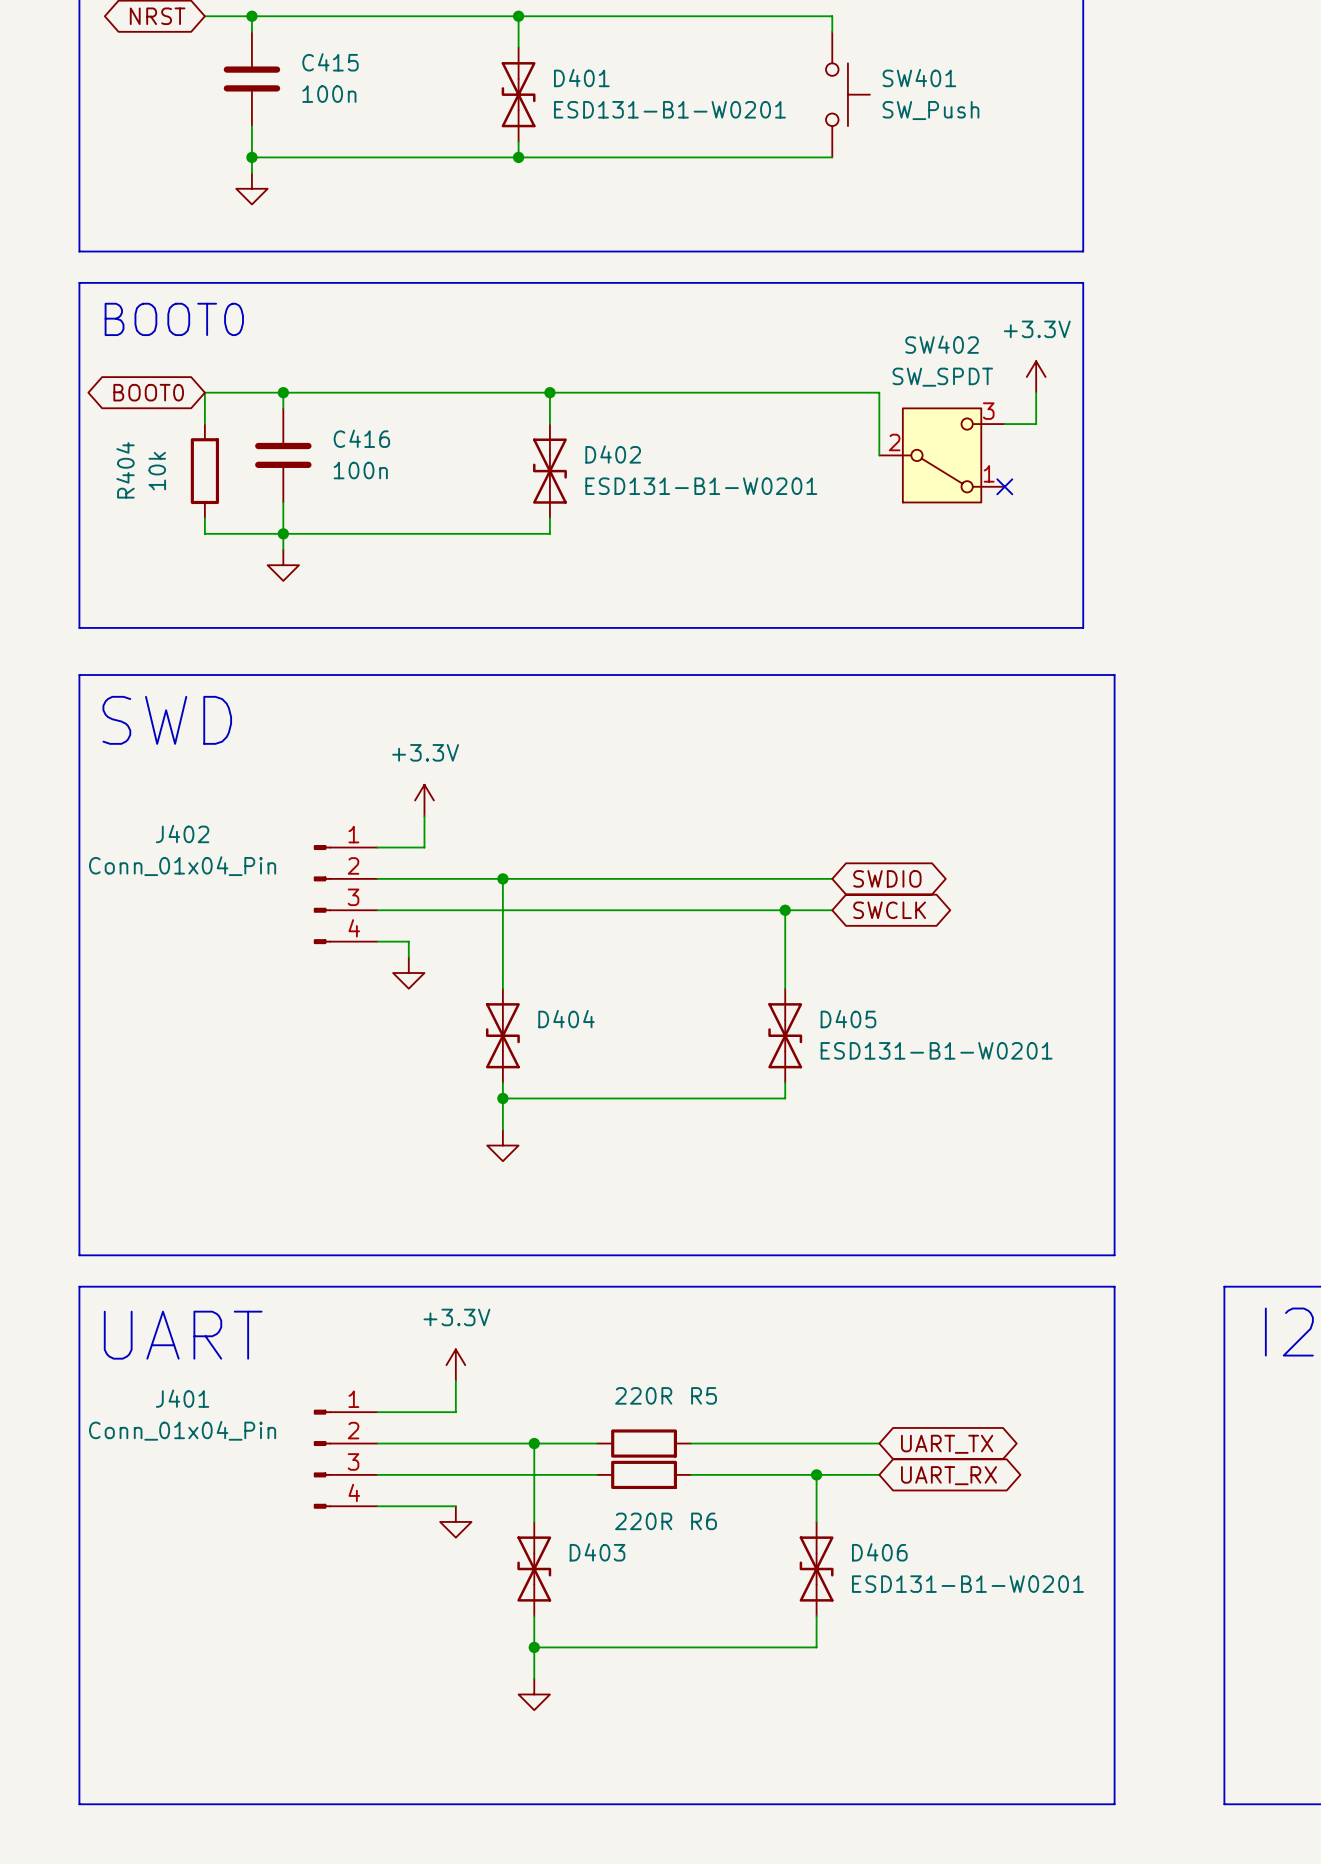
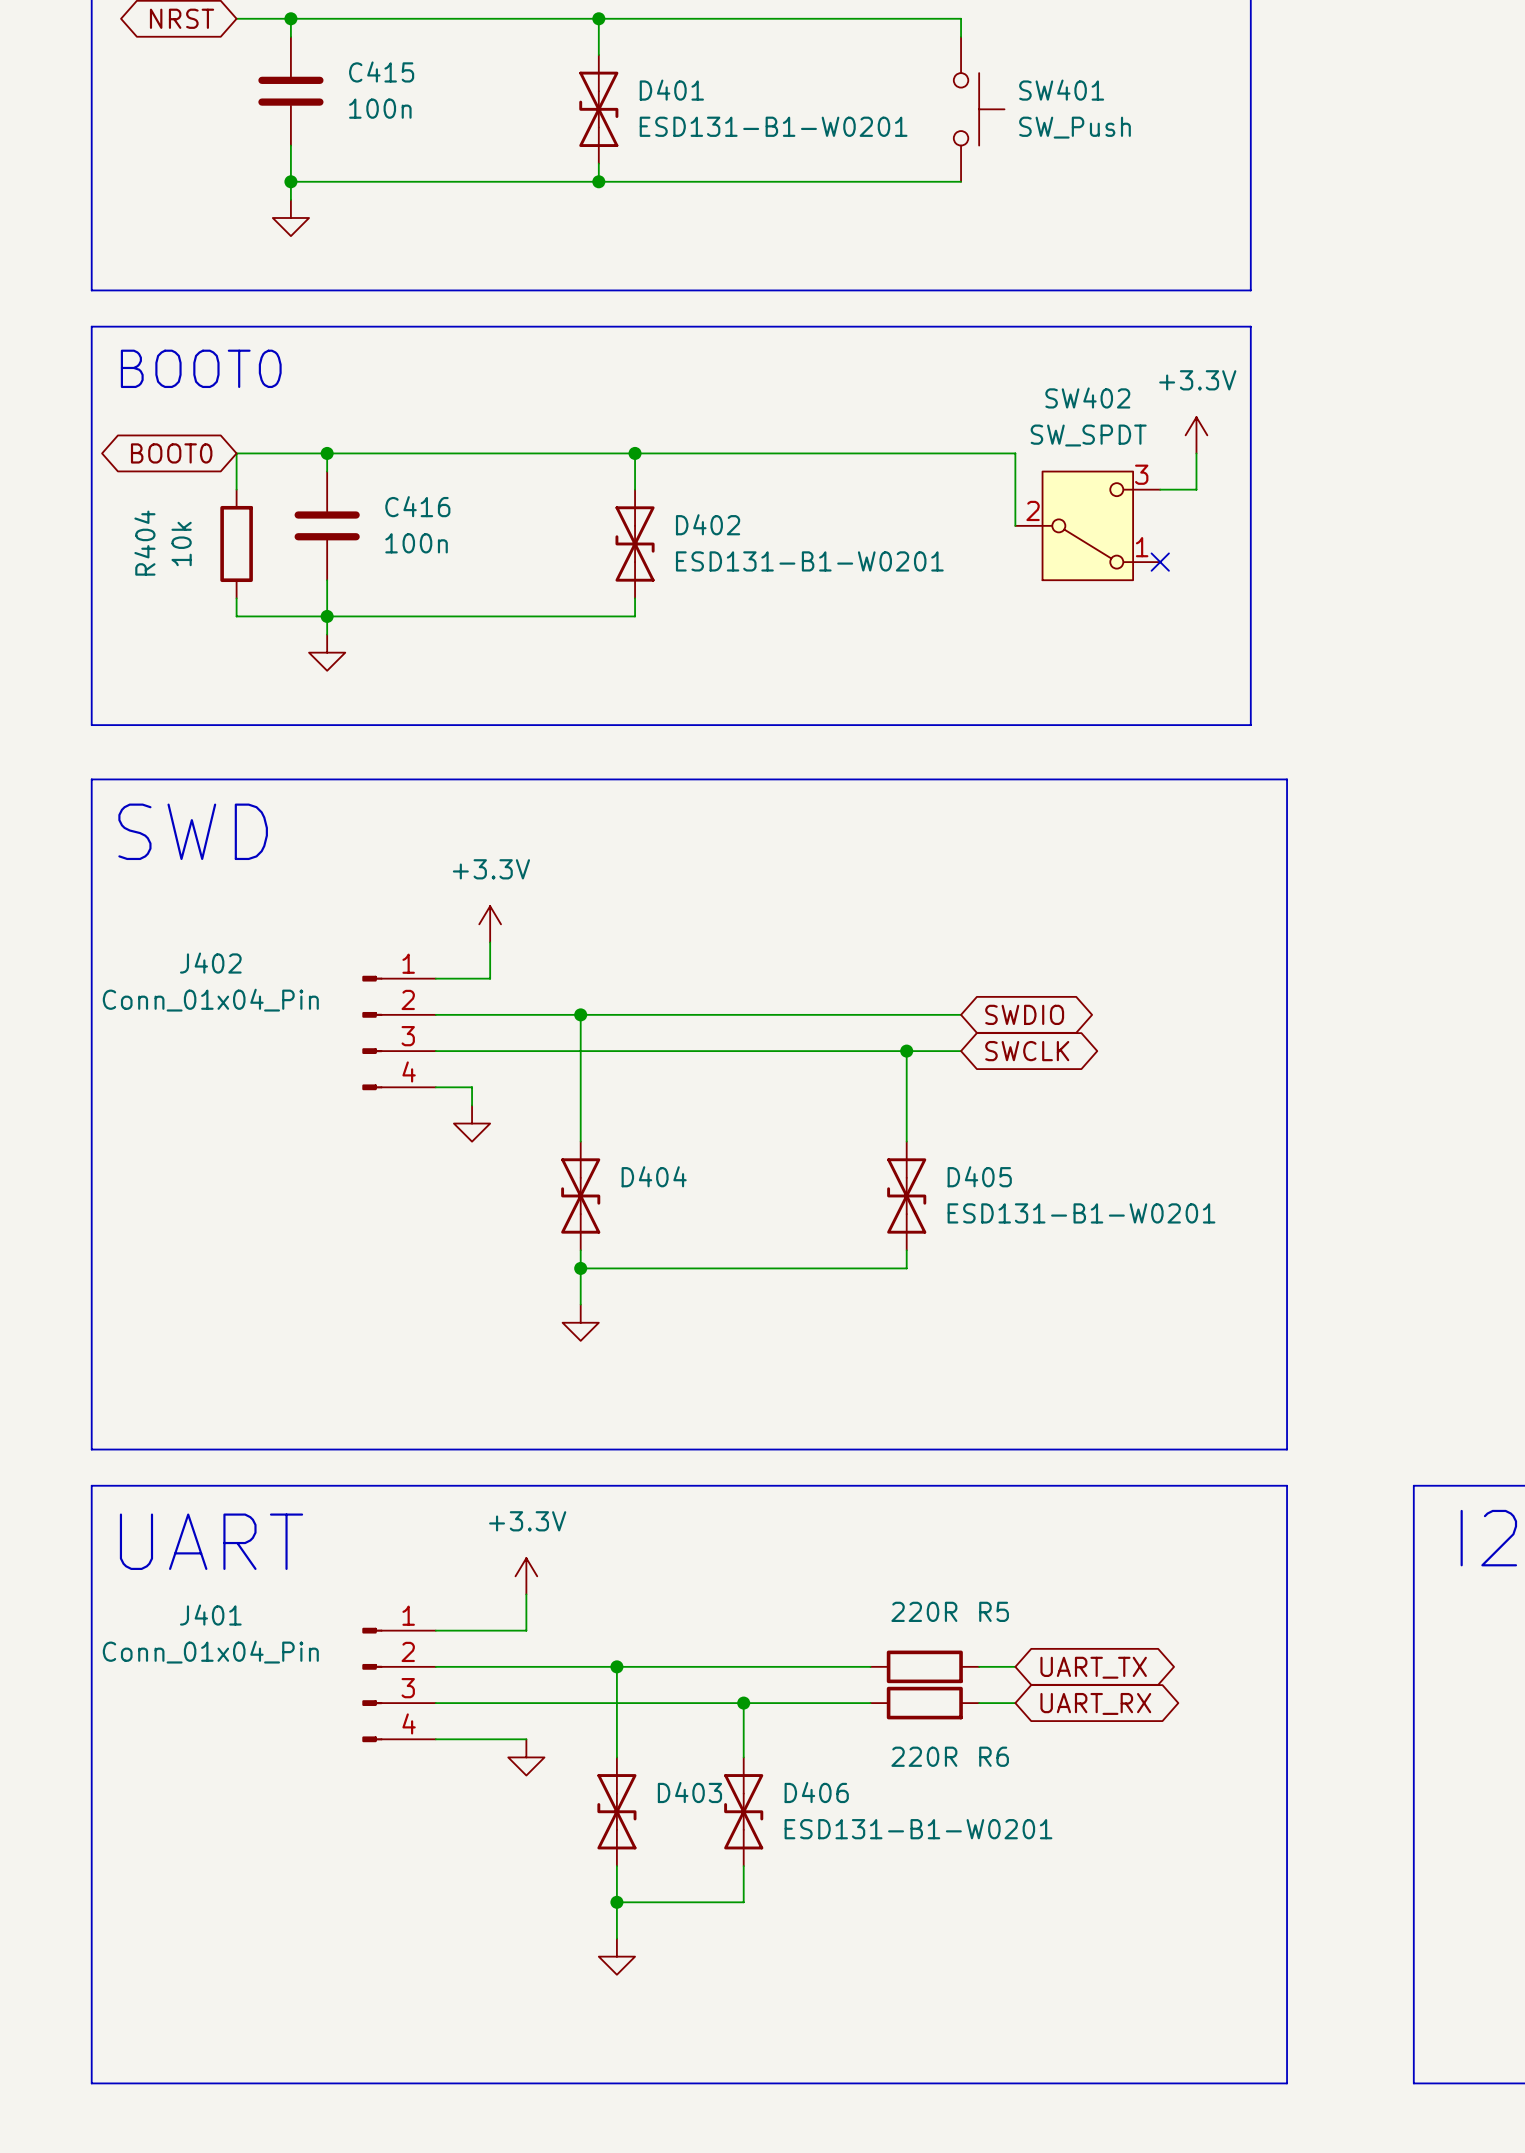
R5 position: (644, 1443) -> (924, 1666)
wire: (753, 1443) (847, 1443) -> (689, 1666) (798, 1666)
junction: none -> (743, 1703)
R6 position: (644, 1474) -> (924, 1703)
wire: (753, 1474) (847, 1474) -> (689, 1703) (798, 1703)
wire: (816, 1474) (816, 1521) -> (743, 1703) (743, 1757)
junction: (816, 1474) -> none
D406 position: (816, 1569) -> (743, 1811)
wire: (816, 1616) (816, 1647) (644, 1647) -> (743, 1866) (743, 1902)

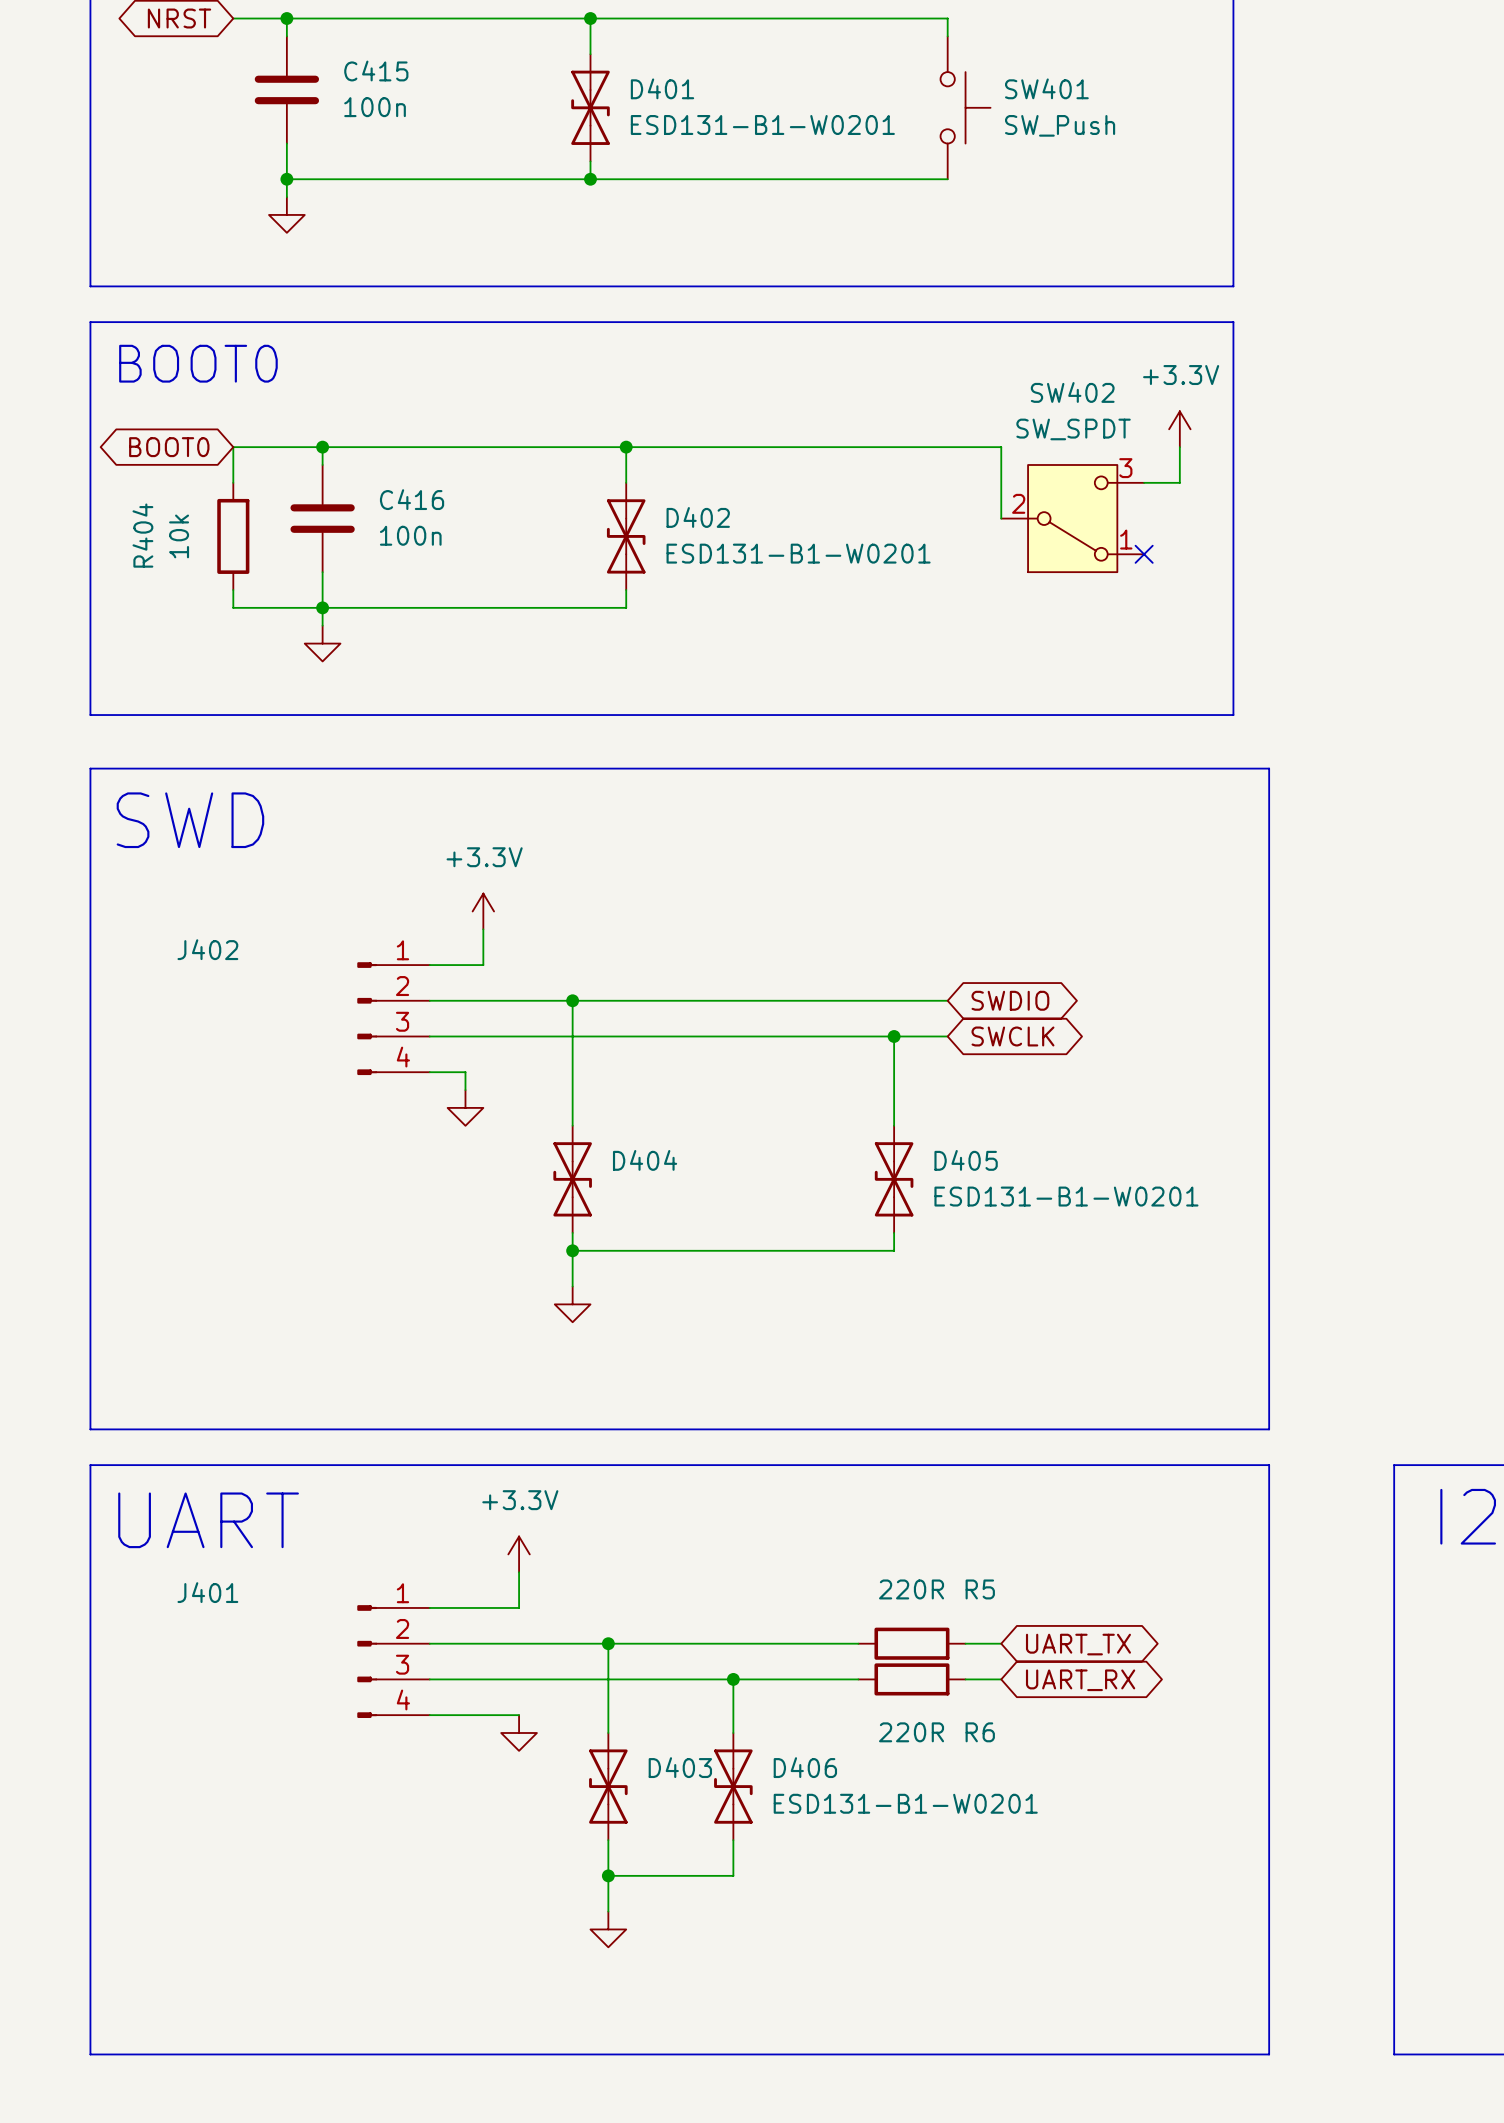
J402 value: Conn_01x04_Pin (210, 1000) -> none
J401 value: Conn_01x04_Pin (210, 1652) -> none

